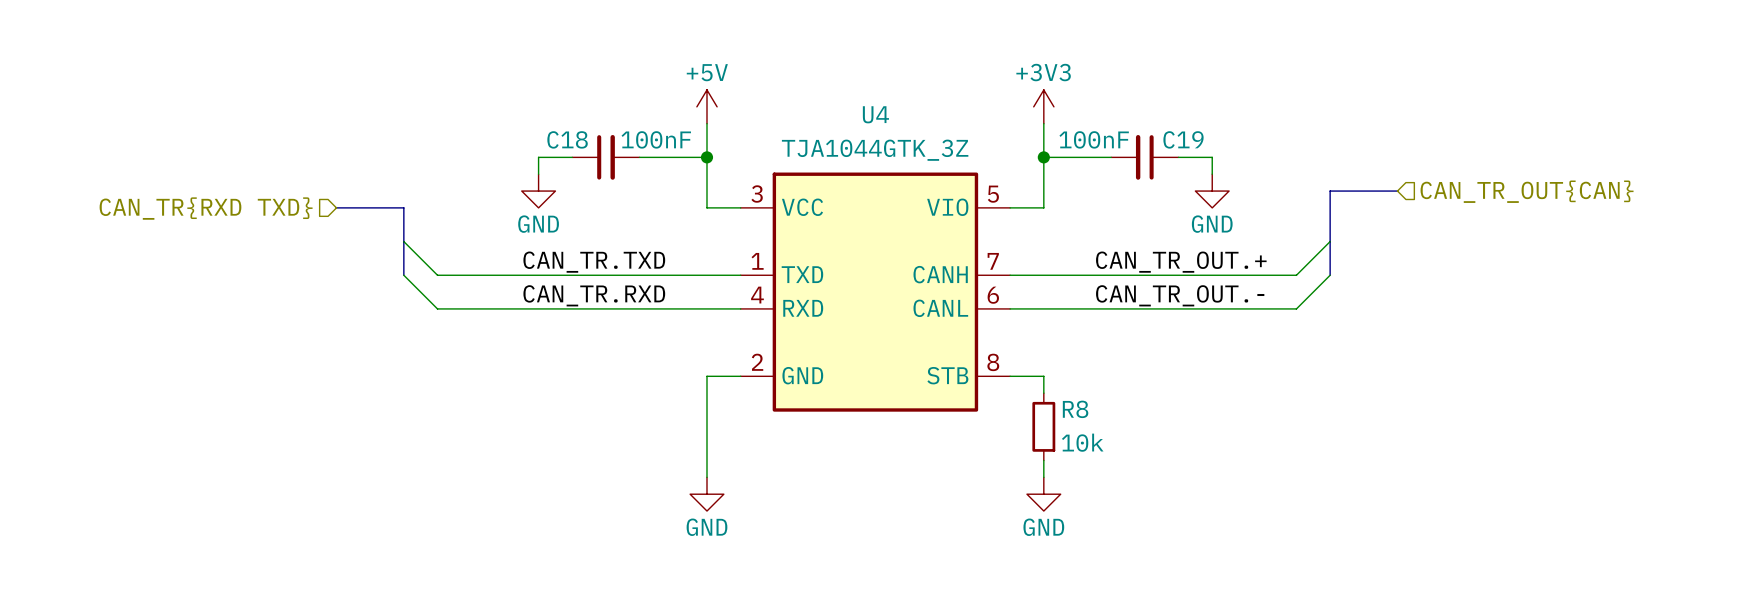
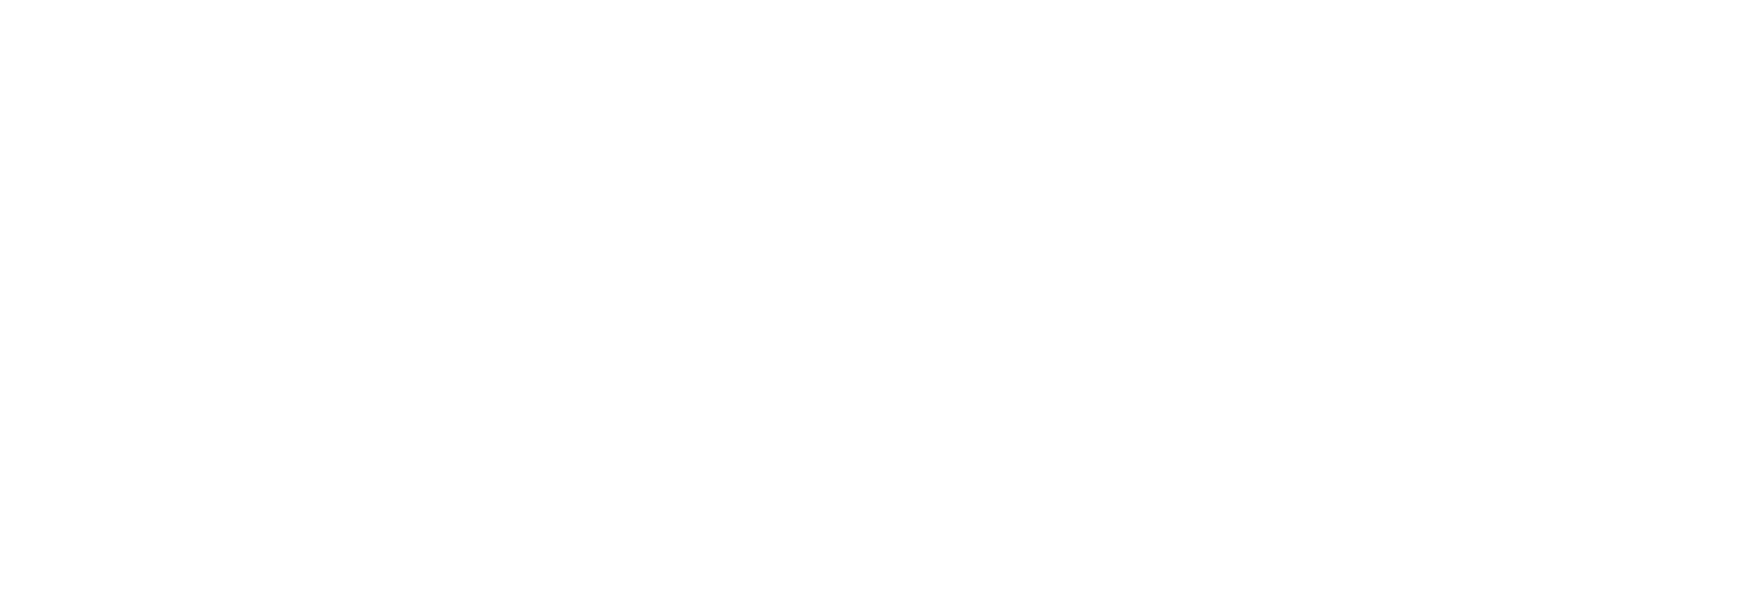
power symbol: +5V (706, 106) -> none
power symbol: +3V3 (1043, 106) -> none
wire: (706, 123) (706, 207) (740, 207) -> none
wire: (1043, 123) (1043, 207) (1010, 207) -> none
wire: (572, 157) (538, 157) (538, 174) -> none
C18: 100nF (605, 157) -> none
wire: (639, 157) (706, 157) -> none
junction: (706, 157) -> none
wire: (1043, 157) (1111, 157) -> none
junction: (1043, 157) -> none
C19: 100nF (1144, 157) -> none
wire: (1178, 157) (1212, 157) (1212, 174) -> none
power symbol: GND (538, 191) -> none
power symbol: GND (1212, 191) -> none
bus: (1397, 191) (1330, 191) (1330, 275) -> none
hierarchical label: CAN_TR_OUT{CAN} (1527, 191) -> none
bus: (336, 207) (403, 207) (403, 275) -> none
hierarchical label: CAN_TR{RXD TXD} (206, 208) -> none
wire: (403, 241) (437, 275) (740, 275) -> none
wire: (1330, 241) (1296, 275) (1010, 275) -> none
label: CAN_TR.TXD (594, 262) -> none
label: CAN_TR_OUT.+ (1181, 262) -> none
wire: (403, 275) (437, 308) (740, 308) -> none
wire: (1330, 275) (1296, 308) (1010, 308) -> none
U4: TJA1044GTK_3Z (875, 292) -> none
label: CAN_TR.RXD (594, 295) -> none
label: CAN_TR_OUT.- (1180, 295) -> none
wire: (740, 376) (706, 376) (706, 477) -> none
wire: (1010, 376) (1043, 376) (1043, 393) -> none
R8: 10k (1043, 426) -> none
wire: (1043, 460) (1043, 477) -> none
power symbol: GND (706, 494) -> none
power symbol: GND (1043, 494) -> none

